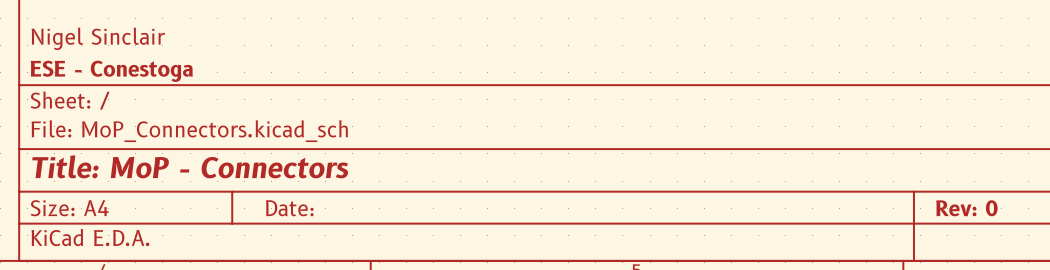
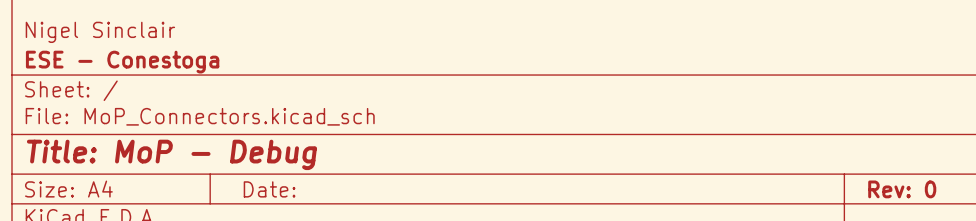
title block: Title: MoP - Connectors (190, 166) -> Title: MoP - Debug (171, 154)

